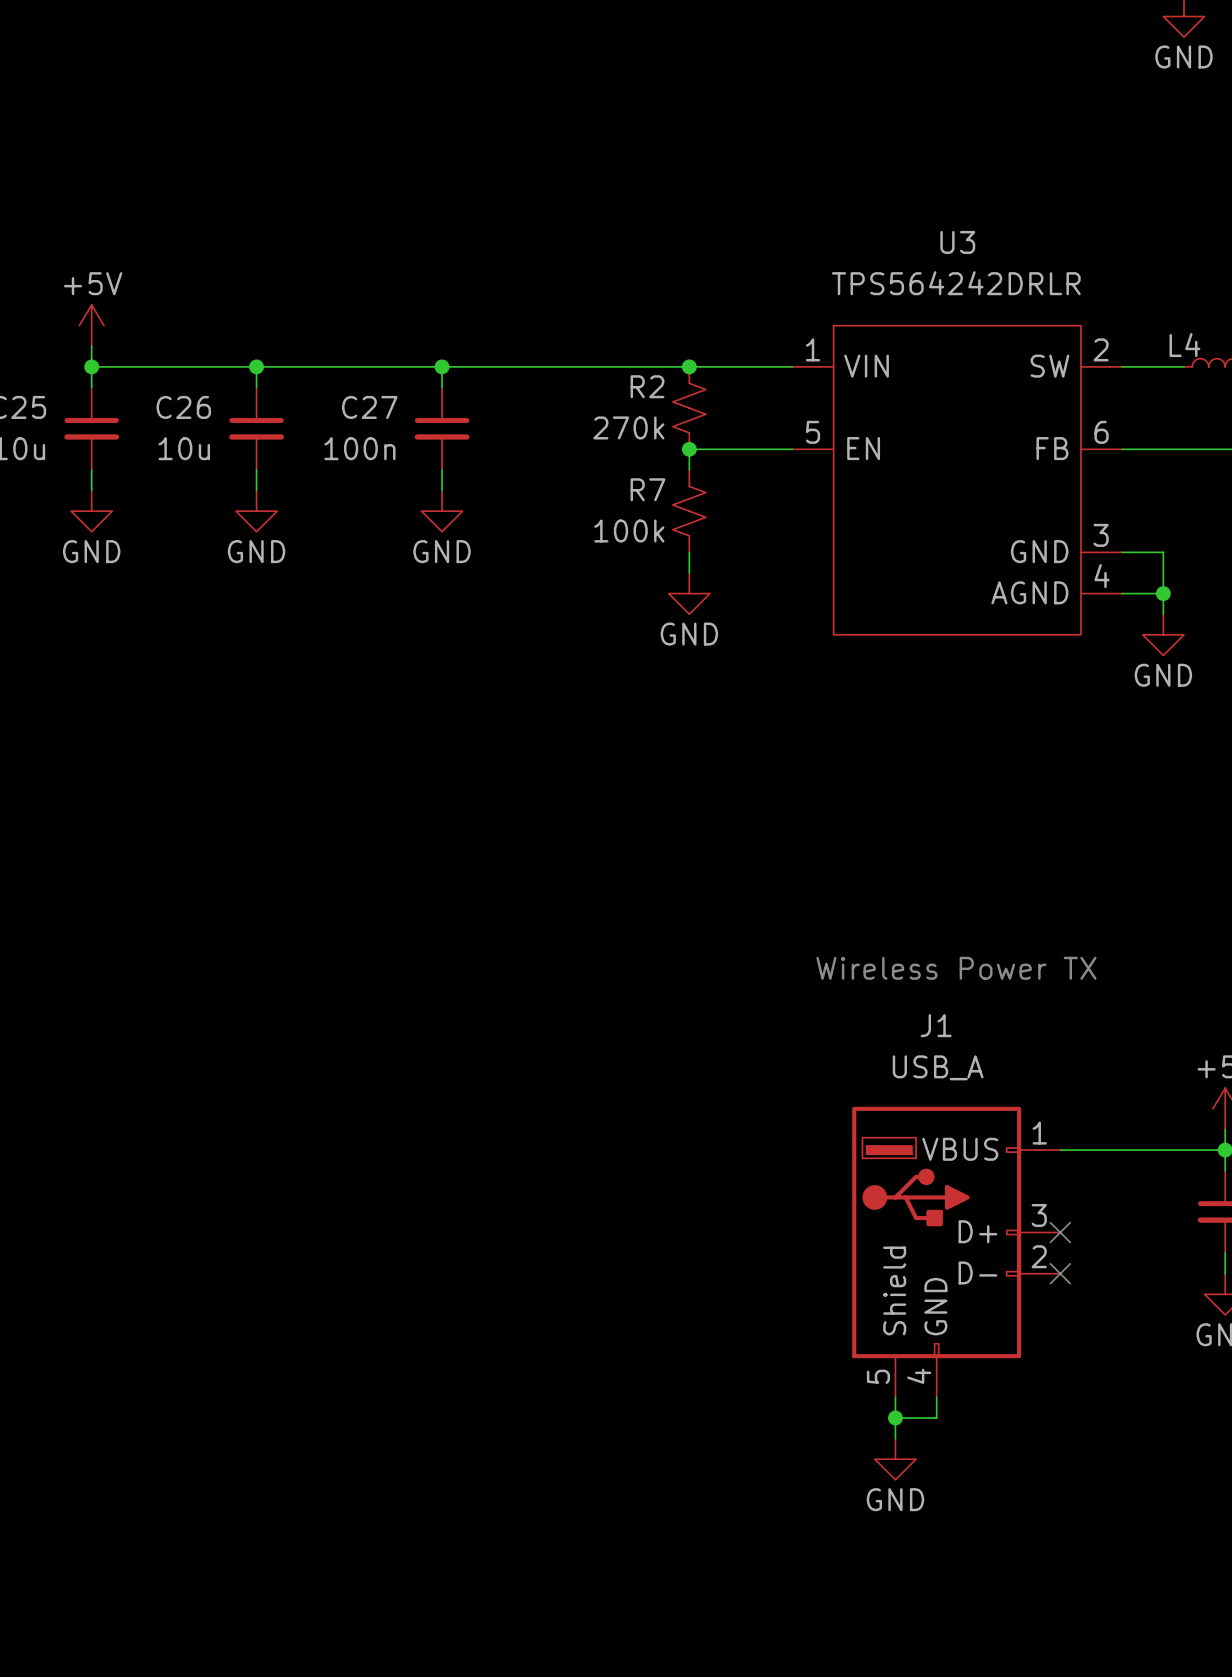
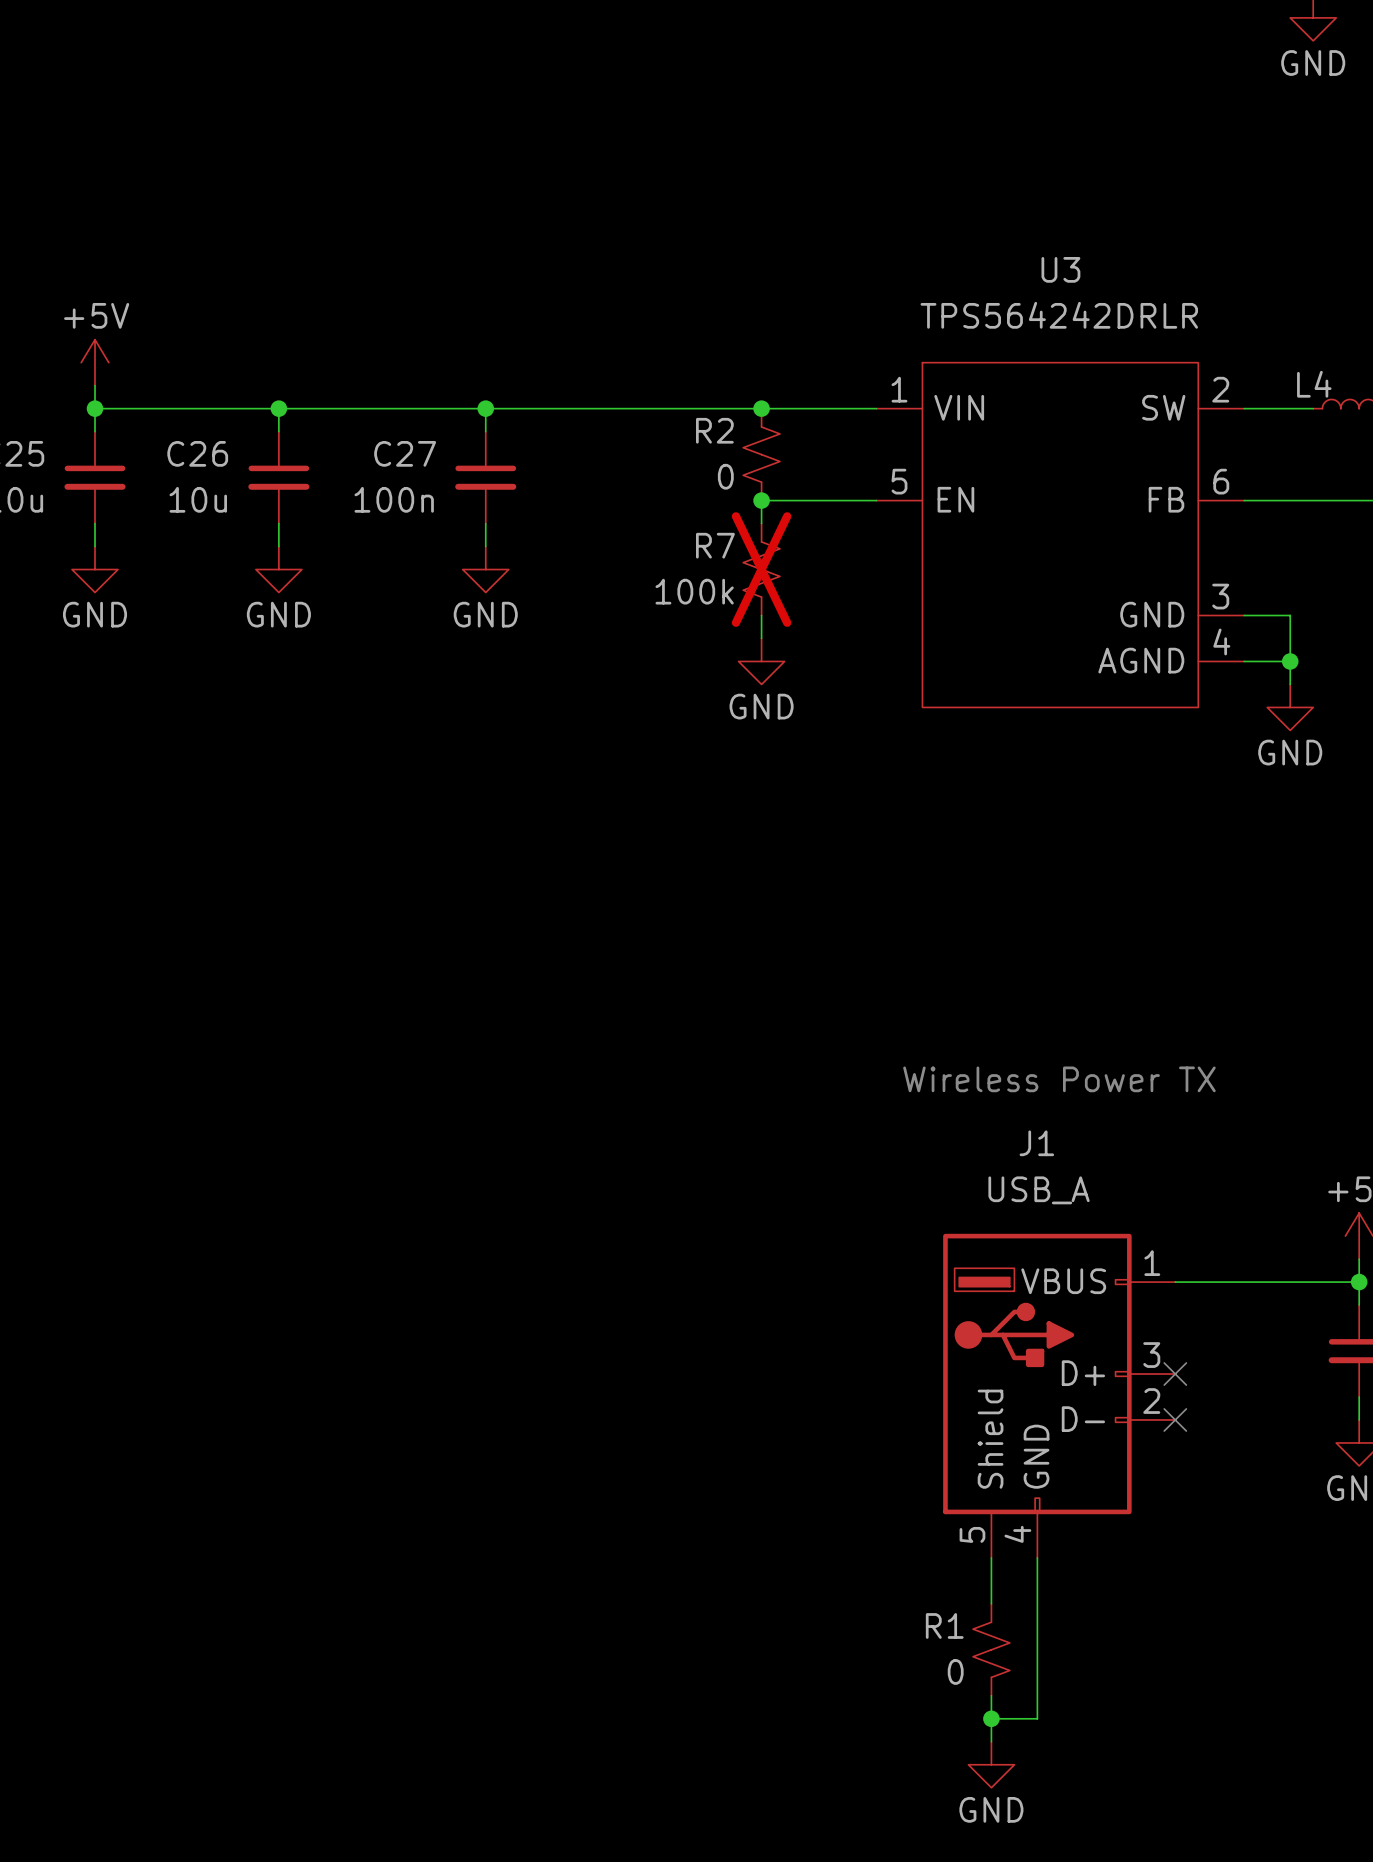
R2 value: 270k (628, 427) -> 0 (725, 476)
R7 do-not-place cross: none -> (761, 569)
wire: (895, 1417) (936, 1417) -> (991, 1718) (1037, 1718) (1037, 1580)
junction: (895, 1417) -> none
power symbol position: GND (895, 1459) -> GND (991, 1764)
R1: none -> 0 (991, 1649)
wire: none -> (991, 1695) (991, 1741)
junction: none -> (991, 1718)

